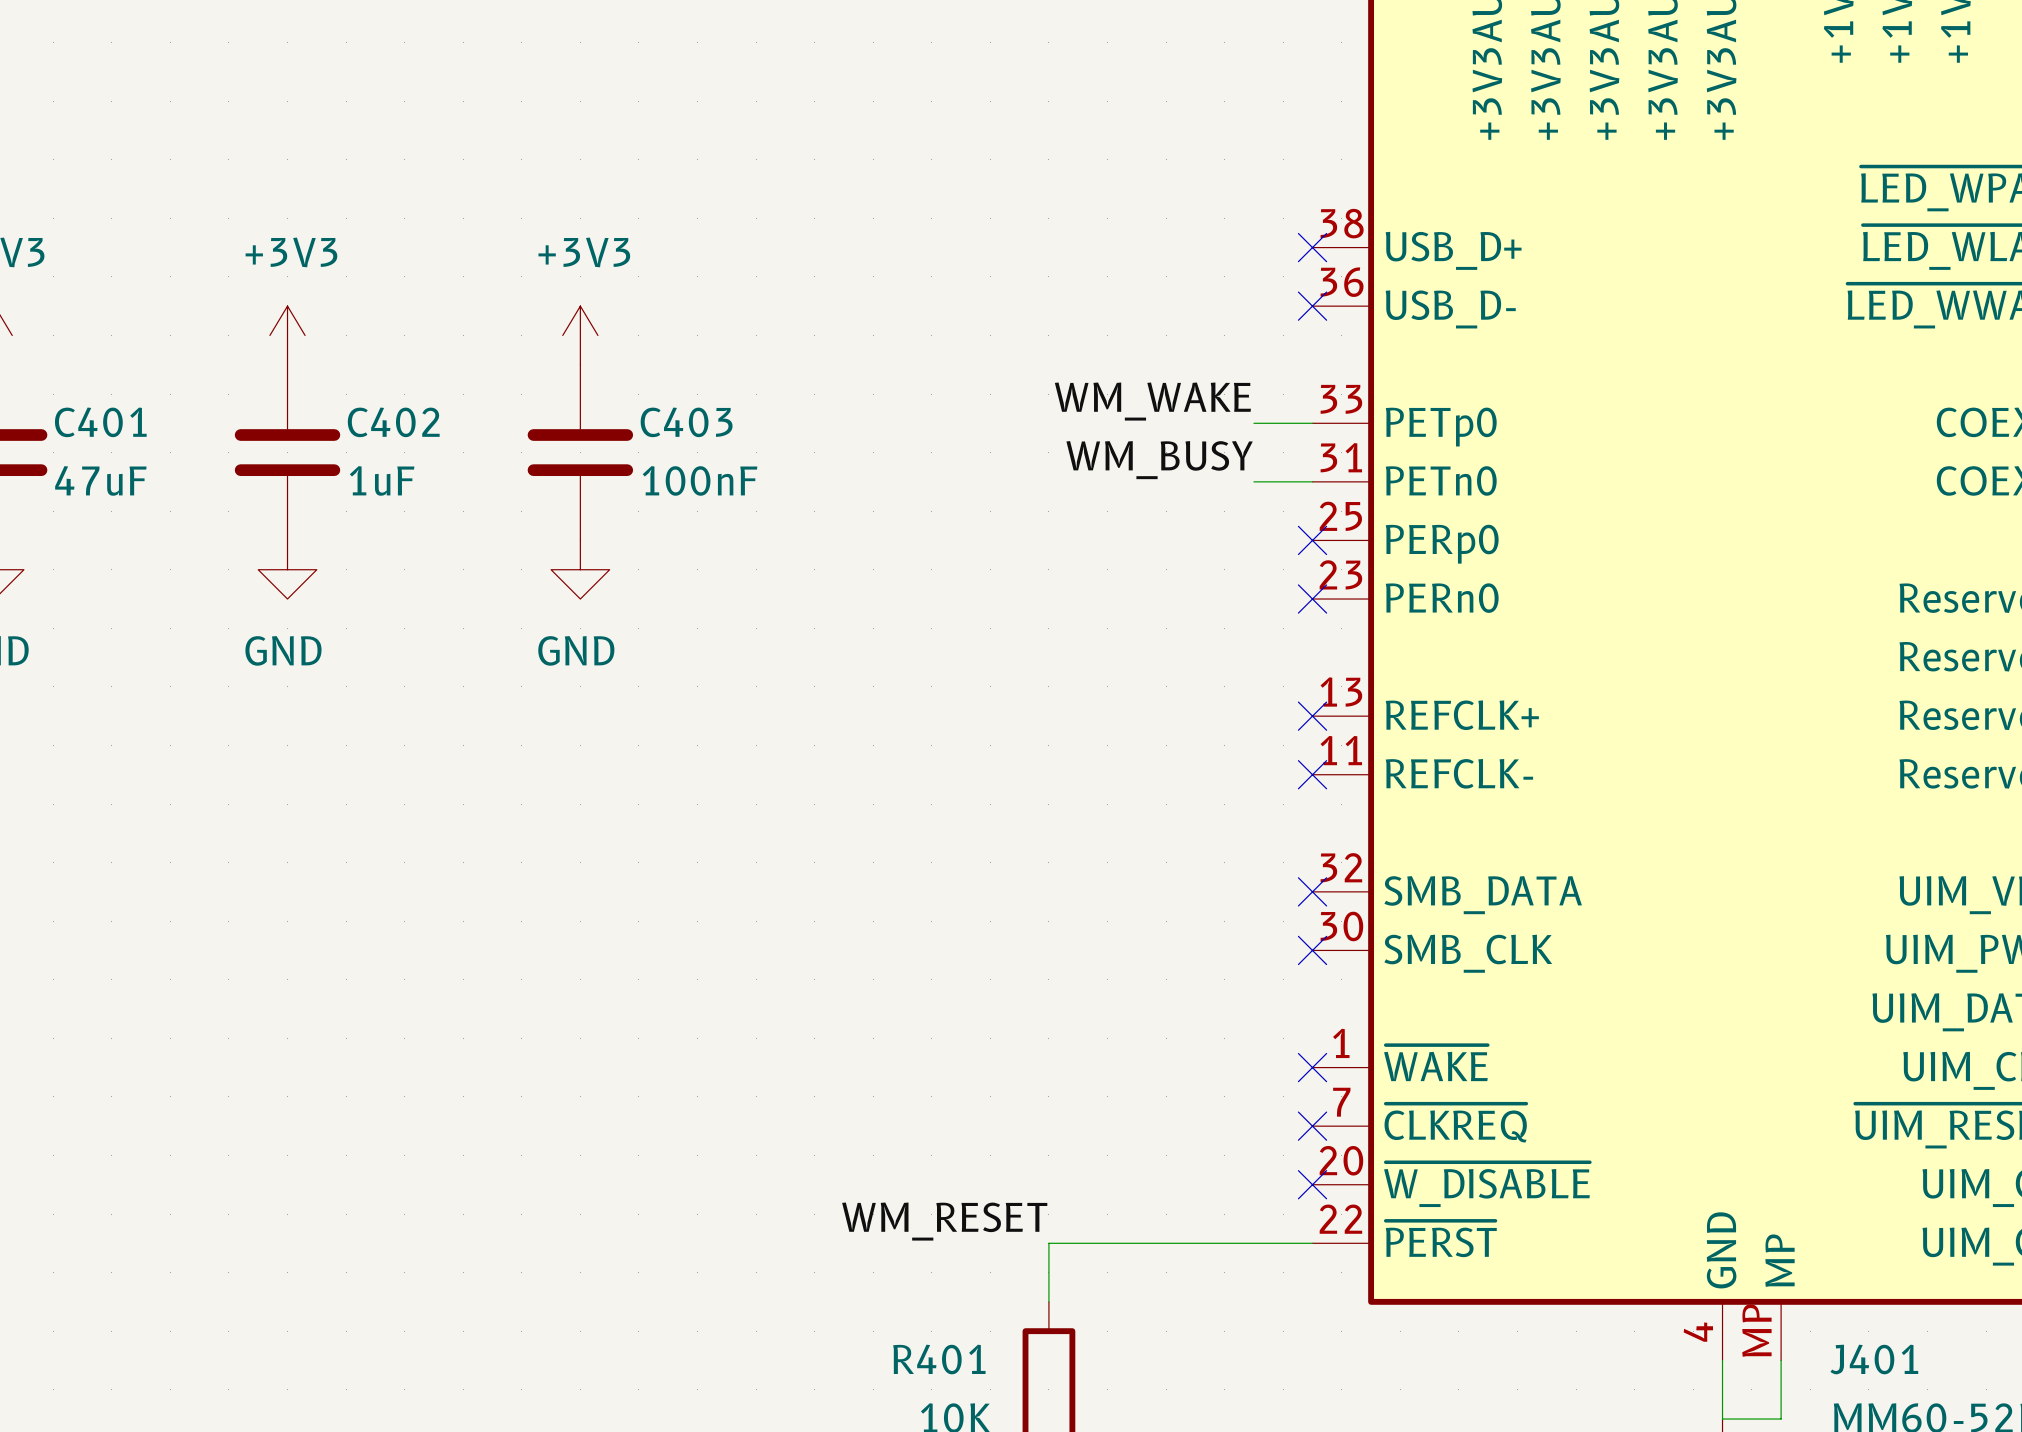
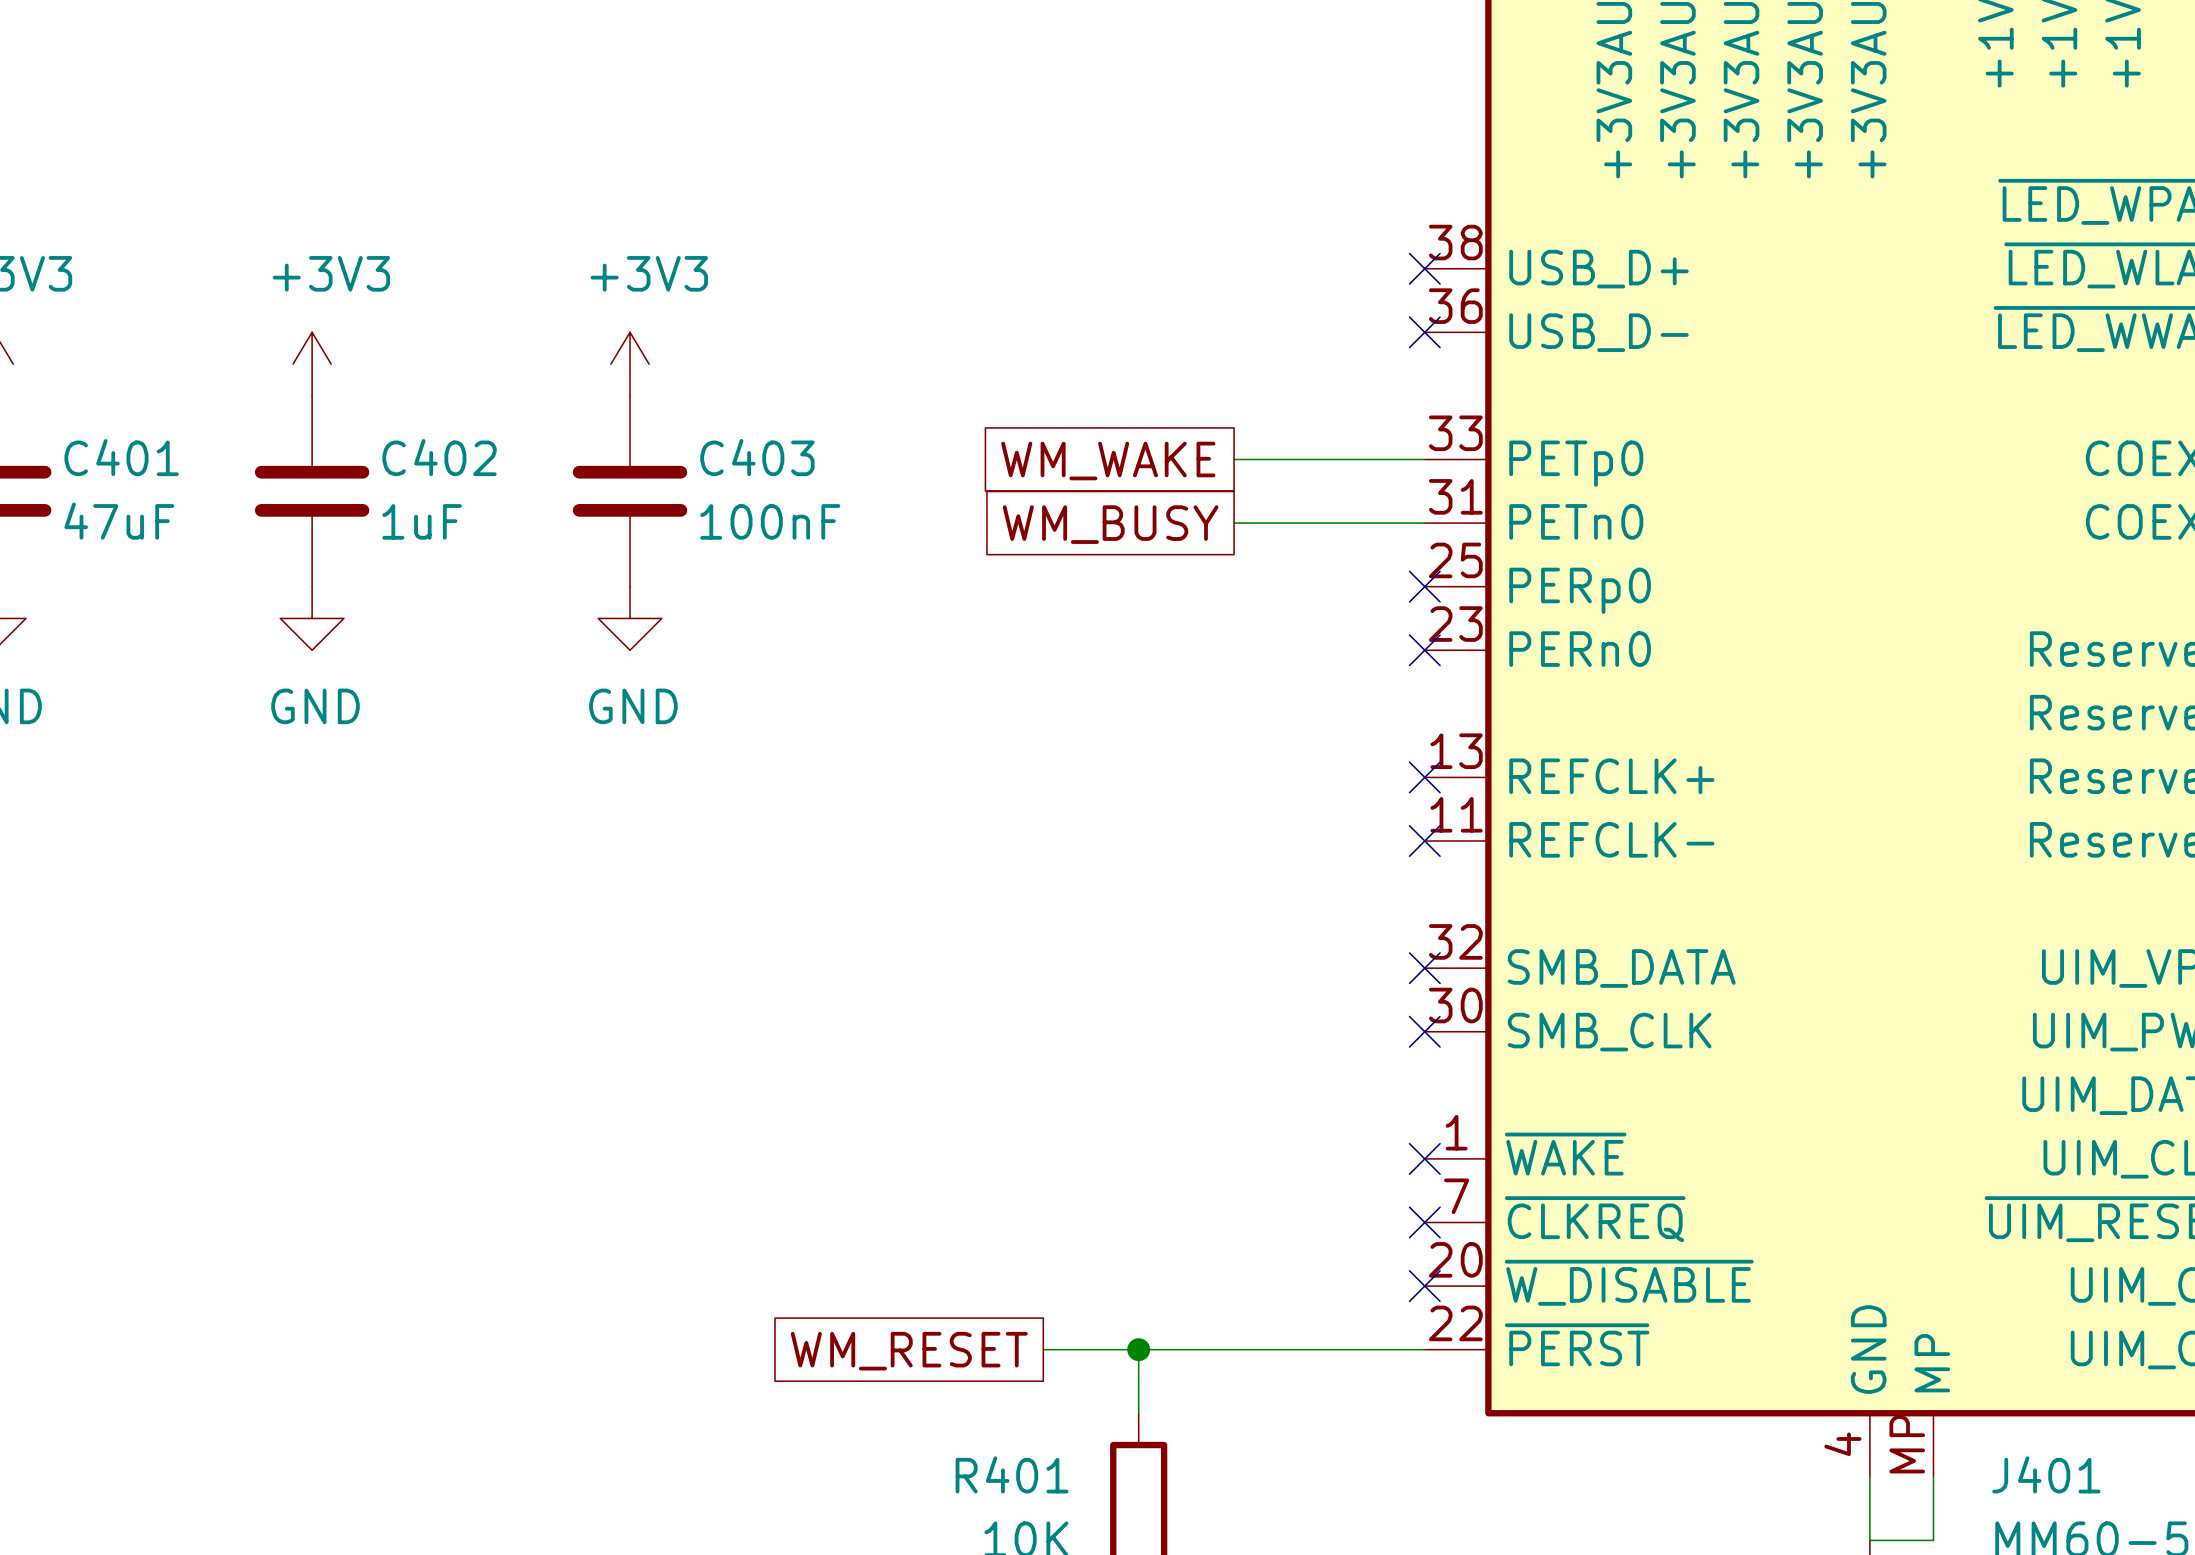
label: WM_WAKE (1152, 401) -> none
wire: none -> (1234, 459) (1361, 459)
global label: none -> WM_WAKE (1108, 461)
label: WM_BUSY (1159, 460) -> none
wire: none -> (1234, 523) (1361, 523)
global label: none -> WM_BUSY (1110, 524)
label: WM_RESET (944, 1221) -> none
wire: none -> (1043, 1349) (1138, 1349)
junction: none -> (1138, 1349)
global label: none -> WM_RESET (909, 1351)

